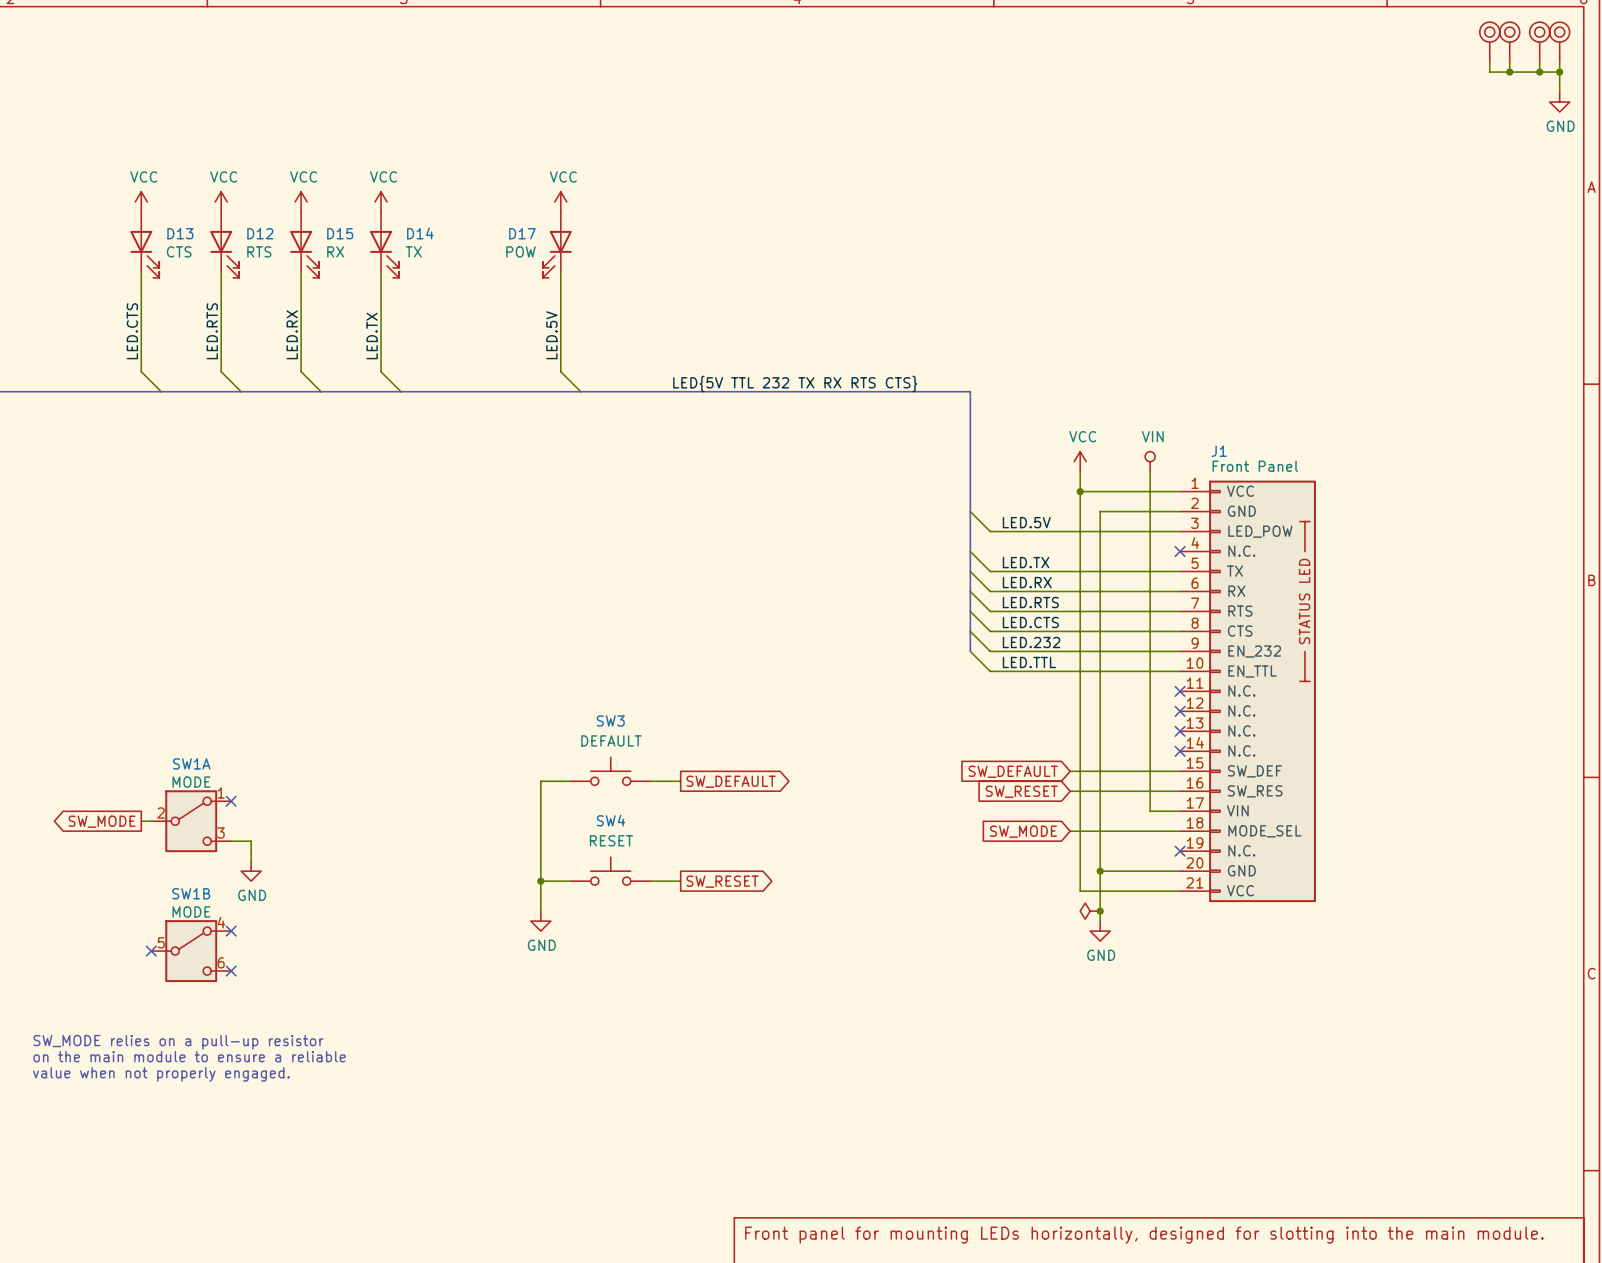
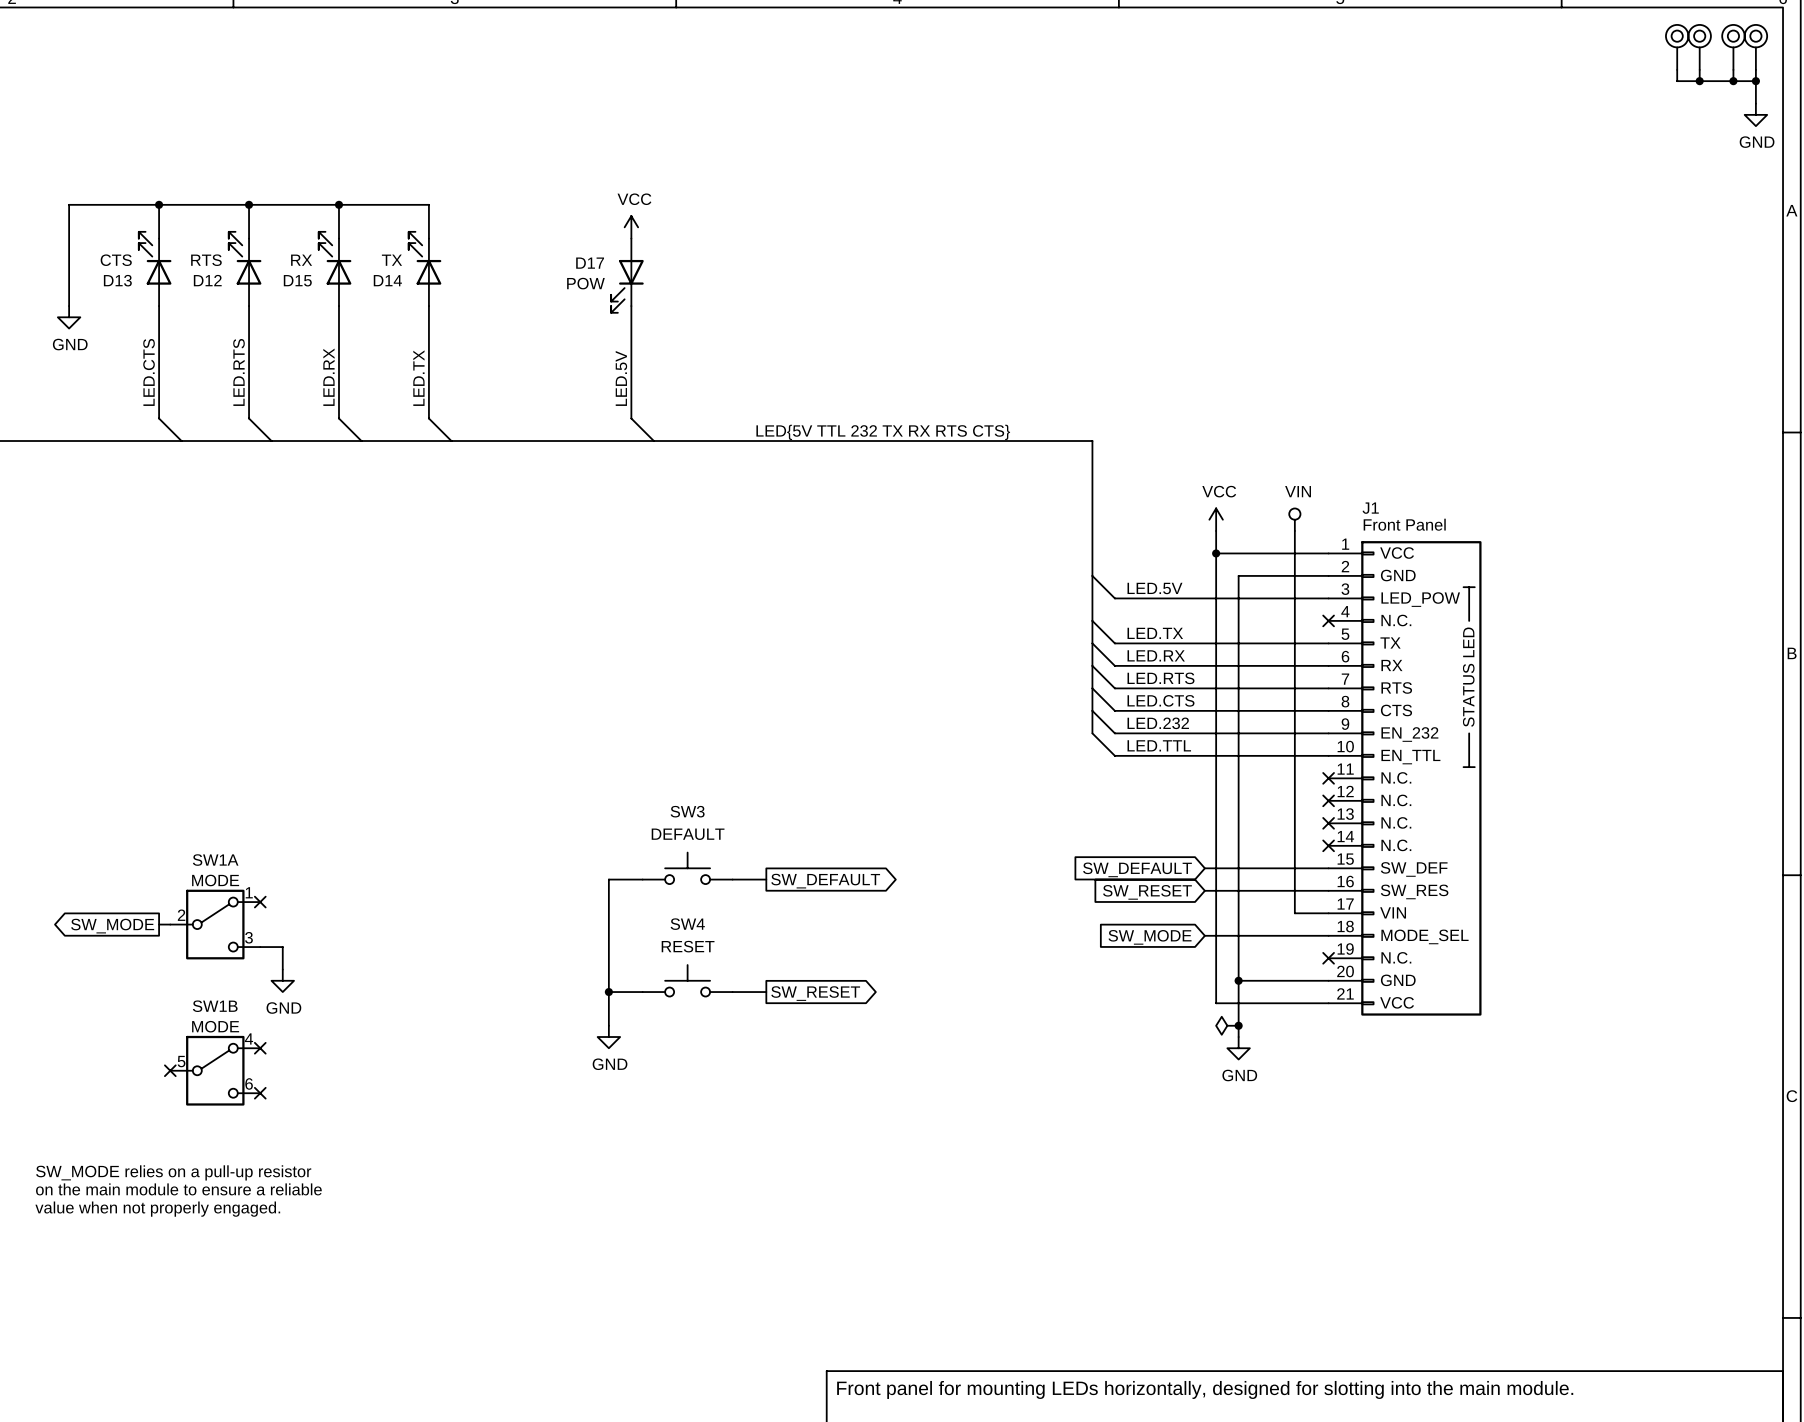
junction: none -> (159, 204)
junction: none -> (249, 204)
junction: none -> (338, 204)
power symbol: VCC (141, 201) -> none
power symbol: VCC (221, 201) -> none
power symbol: VCC (301, 201) -> none
power symbol: VCC (381, 201) -> none
wire: none -> (428, 238) (428, 204) (69, 204) (69, 306)
D13 rotation: 0° (144, 254) -> 180° (155, 258)
D12 rotation: 0° (224, 254) -> 180° (245, 258)
D15 rotation: 0° (304, 254) -> 180° (335, 258)
D14 rotation: 0° (384, 254) -> 180° (425, 258)
power symbol: none -> GND (69, 317)

